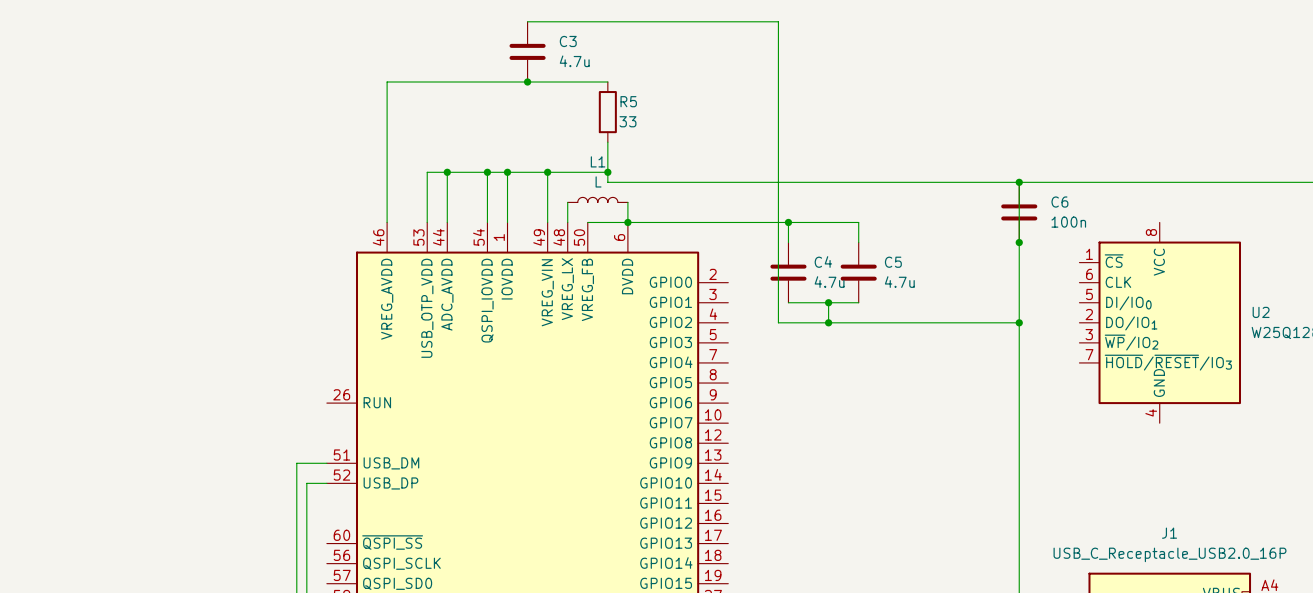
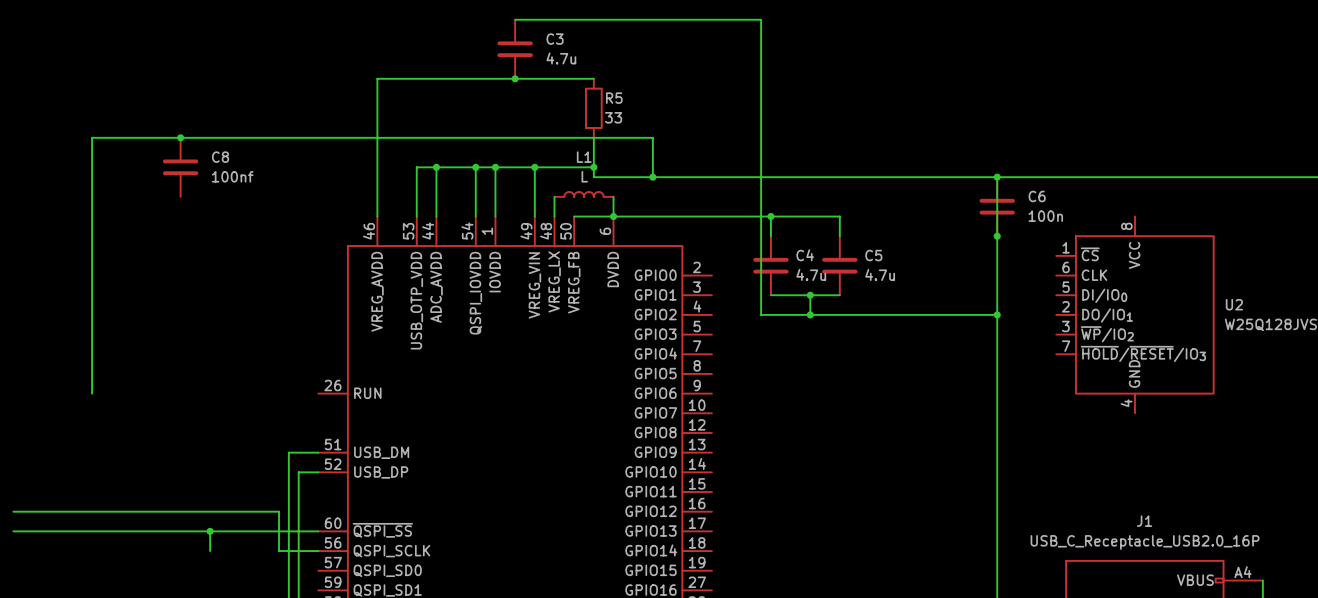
junction: none -> (180, 137)
C8: none -> 100nf (180, 167)
wire: none -> (652, 177) (652, 137) (92, 137) (92, 393)
junction: none -> (652, 177)
wire: none -> (13, 511) (279, 511) (279, 551) (318, 551)
wire: none -> (13, 531) (318, 531)
wire: none -> (210, 531) (210, 551)
junction: none -> (210, 531)

